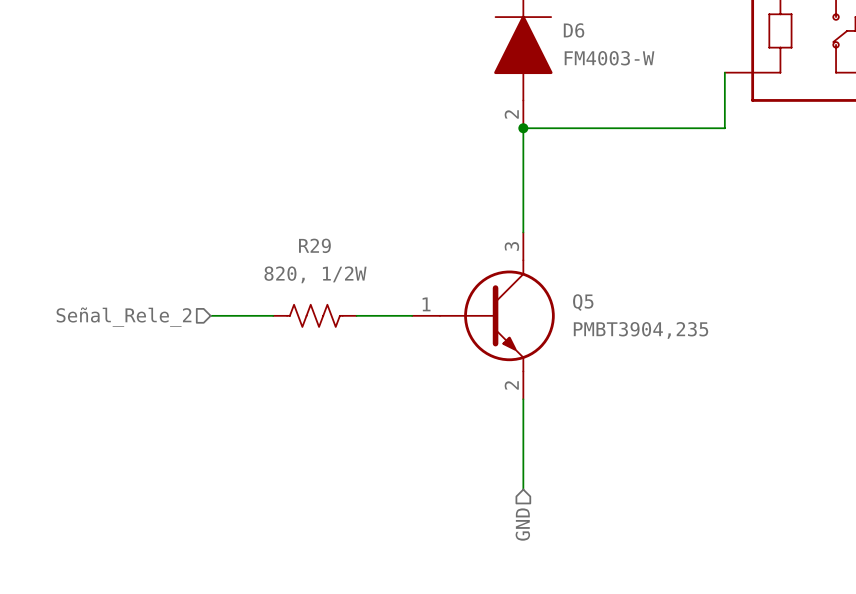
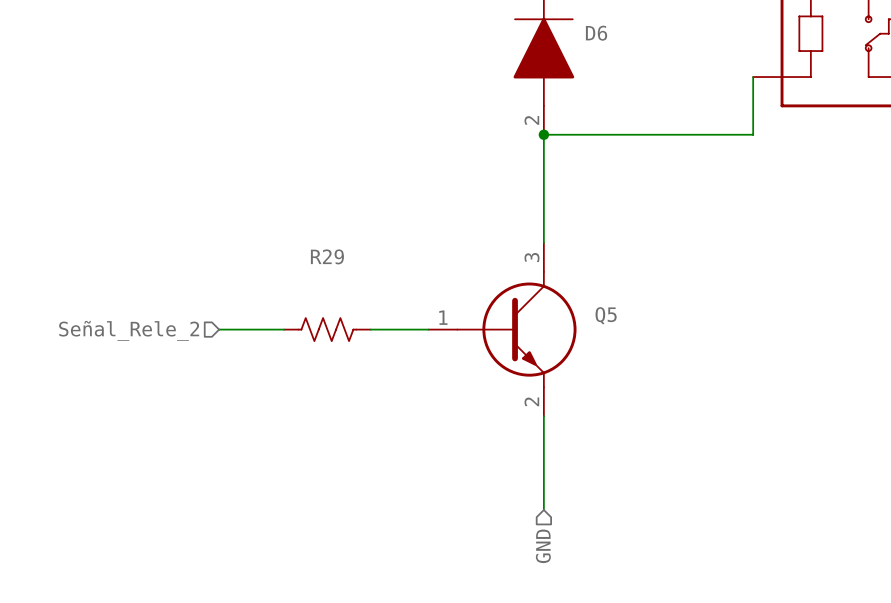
D6 value: FM4003-W (609, 58) -> none
R29 value: 820, 1/2W (315, 274) -> none
Q5 value: PMBT3904,235 (641, 330) -> none

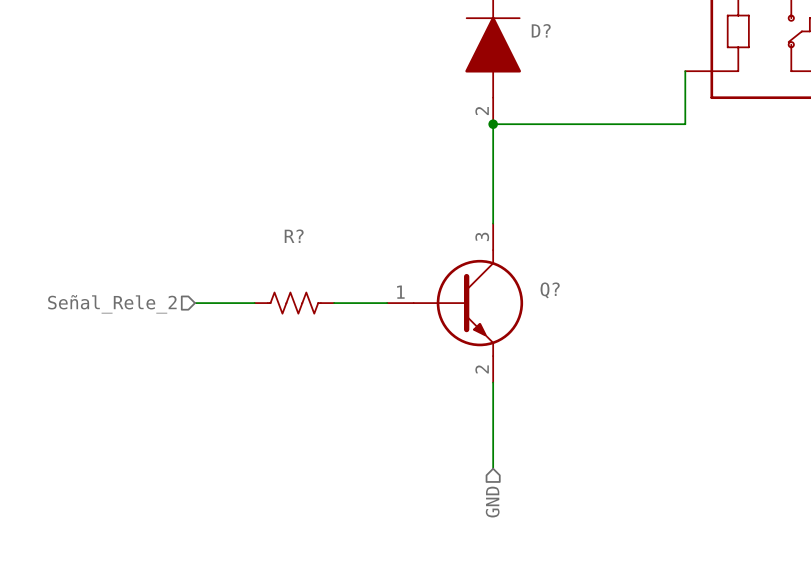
D6 name: D6 (596, 33) -> D? (541, 30)
R29 name: R29 (327, 256) -> R? (294, 236)
Q5 name: Q5 (606, 315) -> Q? (550, 290)

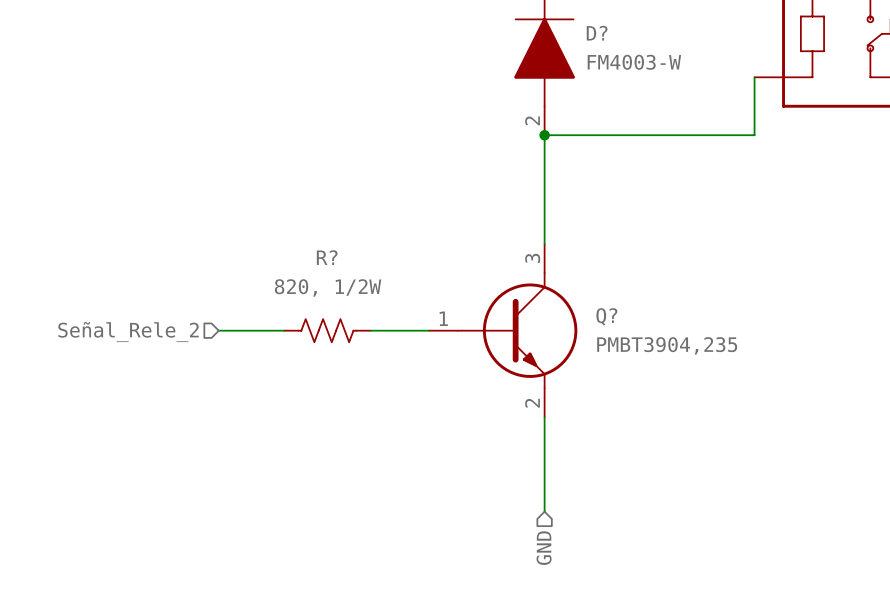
D? value: none -> FM4003-W (634, 62)
R? value: none -> 820, 1/2W (328, 287)
Q? value: none -> PMBT3904,235 (667, 345)

